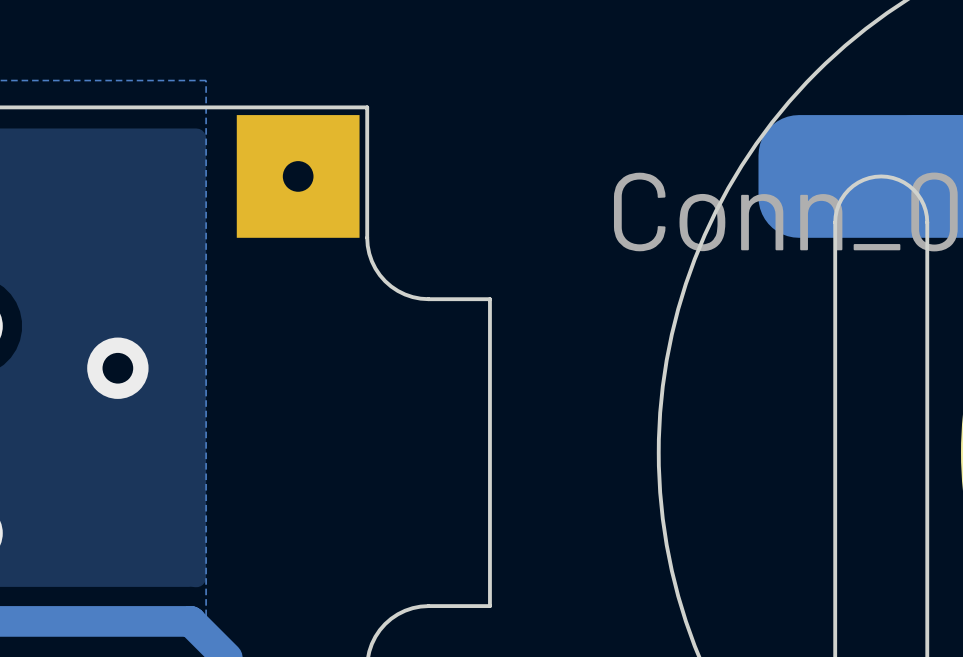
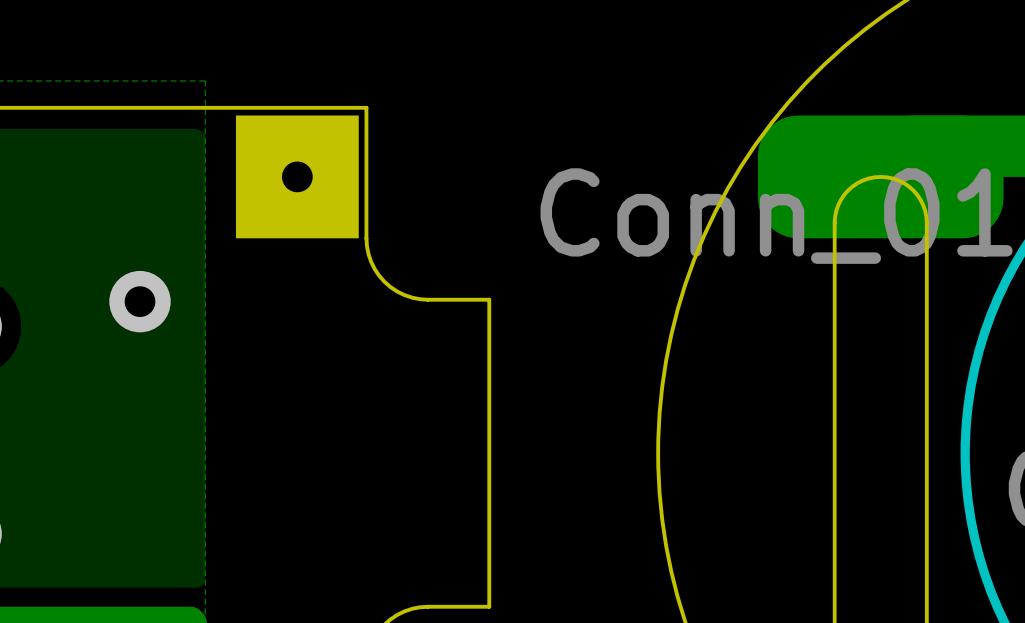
via position: (117, 368) -> (140, 301)

